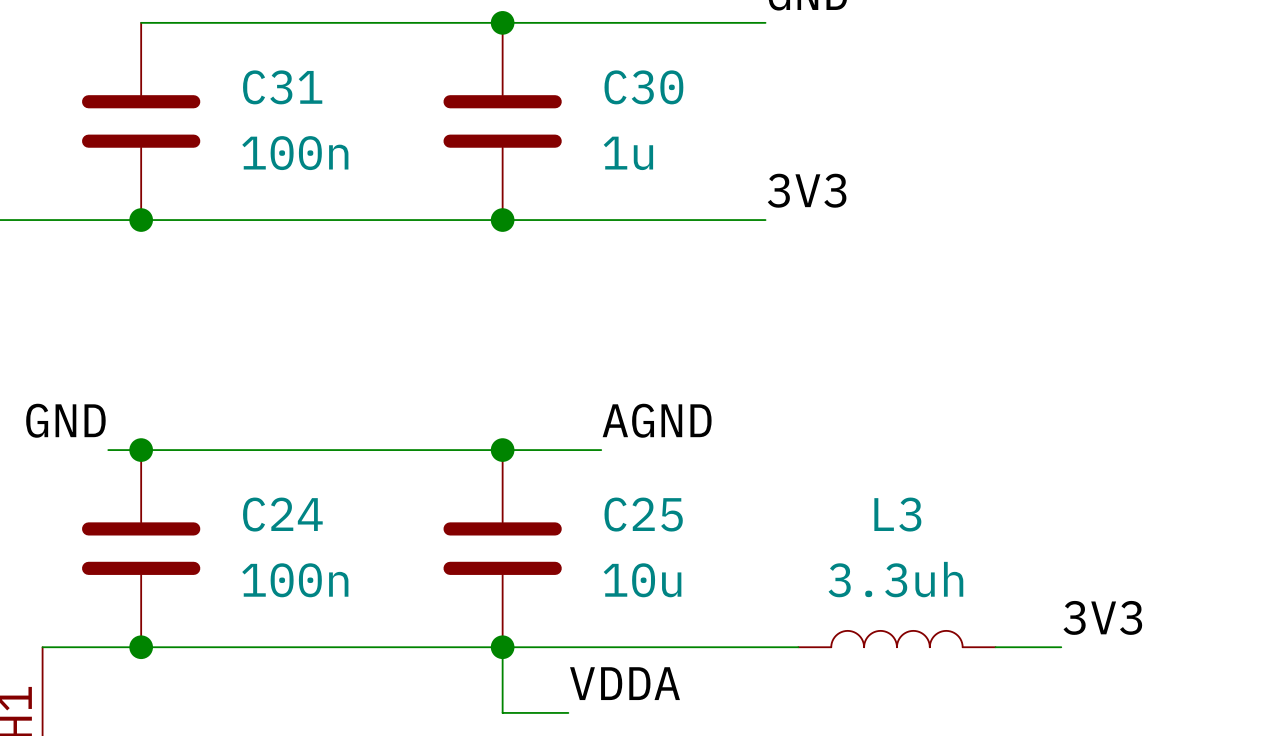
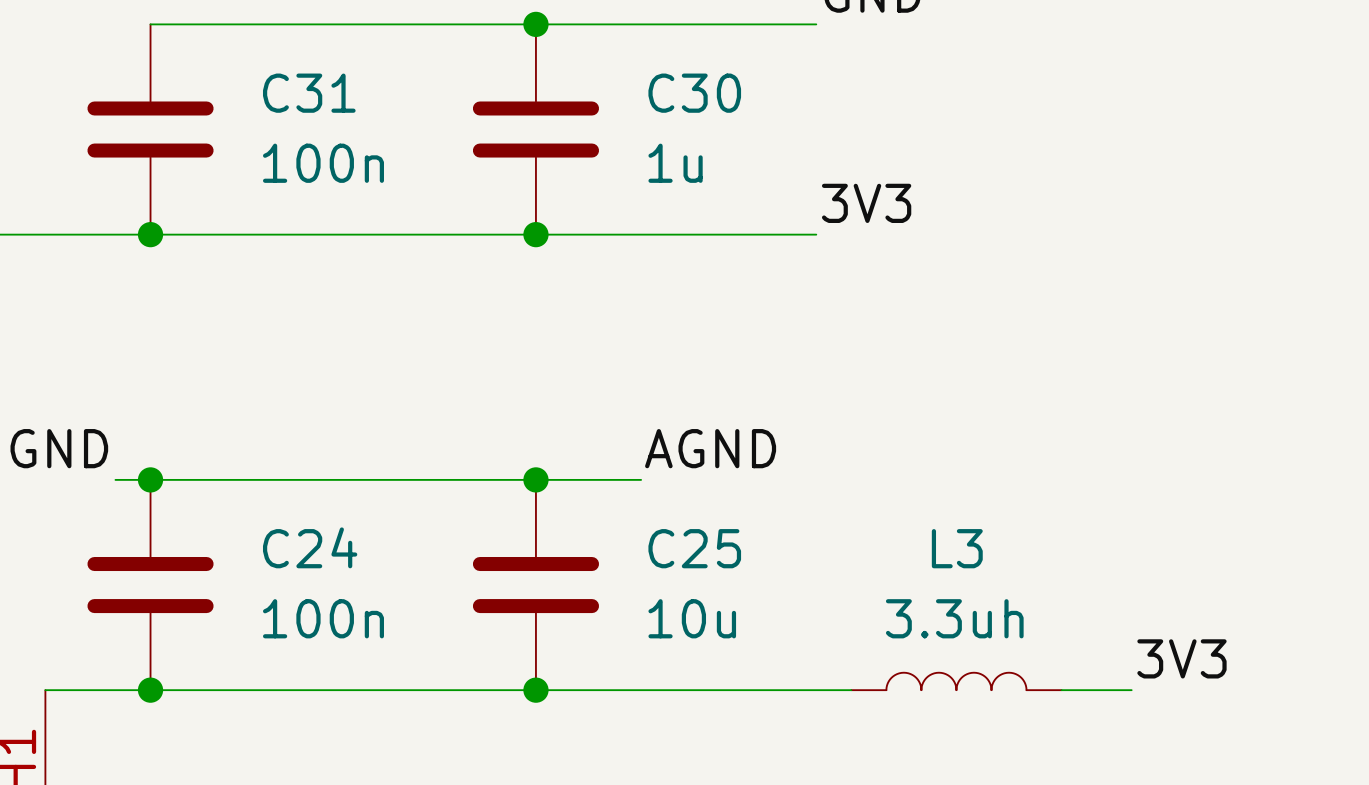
wire: (502, 647) (502, 712) (568, 712) -> none
label: VDDA (624, 683) -> none

